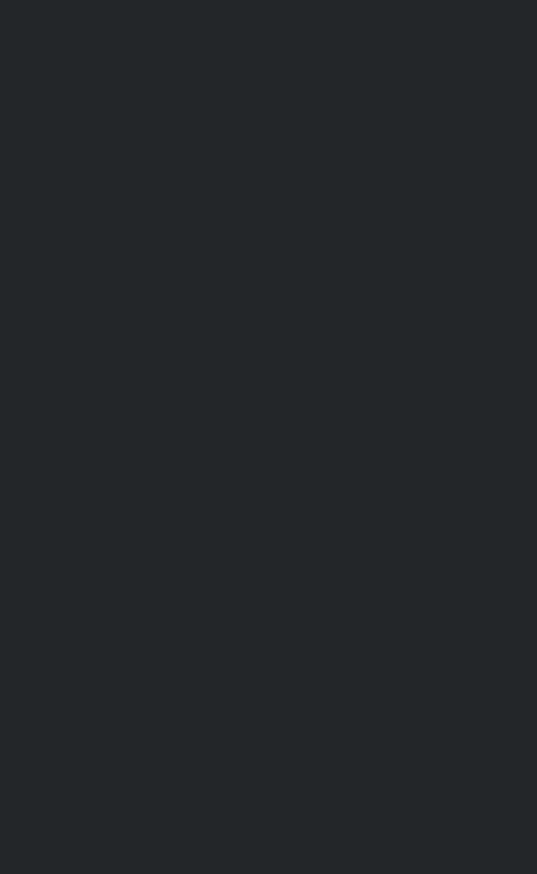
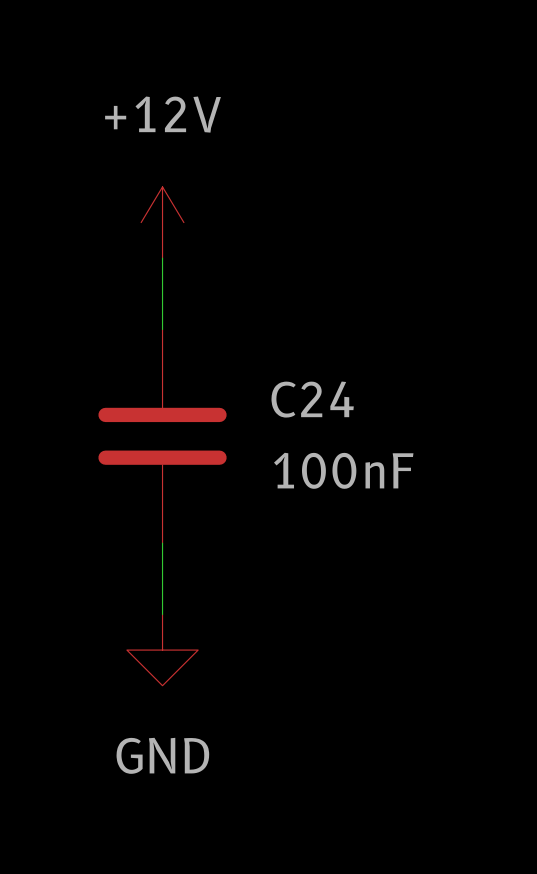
power symbol: none -> +12V (162, 222)
wire: none -> (162, 258) (162, 329)
C24: none -> 100nF (162, 436)
wire: none -> (162, 543) (162, 614)
power symbol: none -> GND (162, 650)

